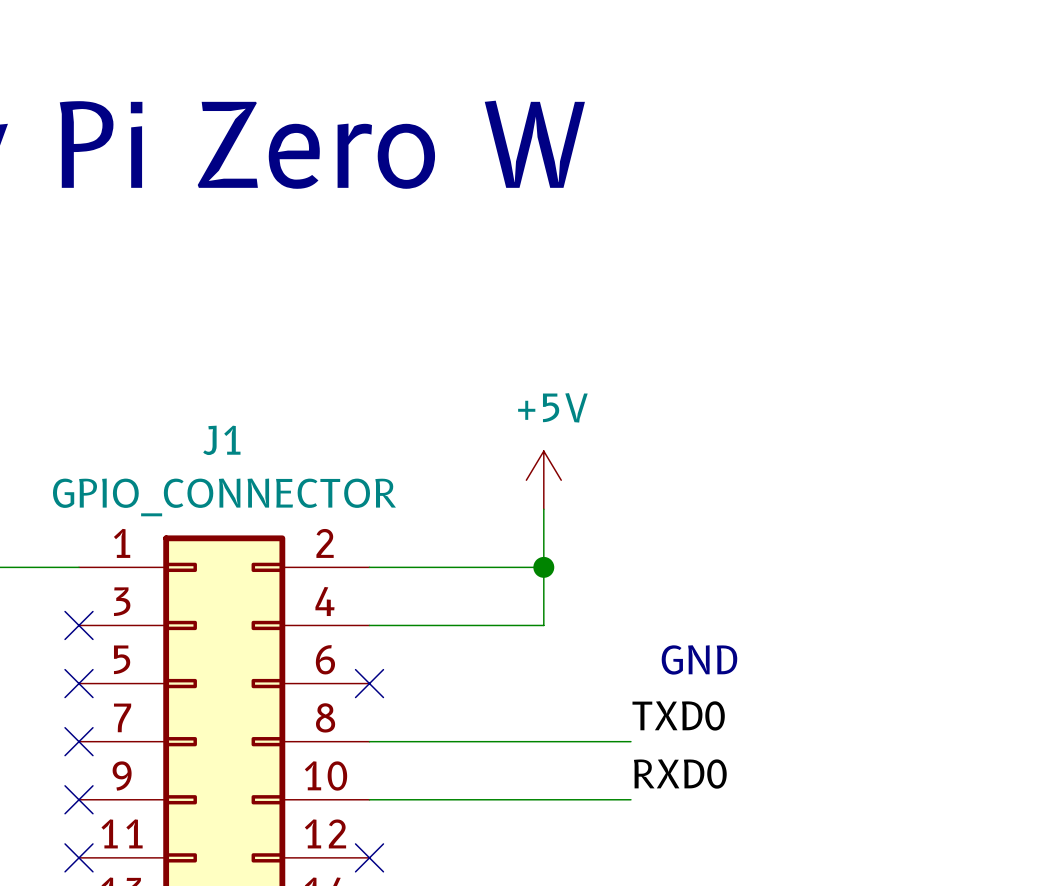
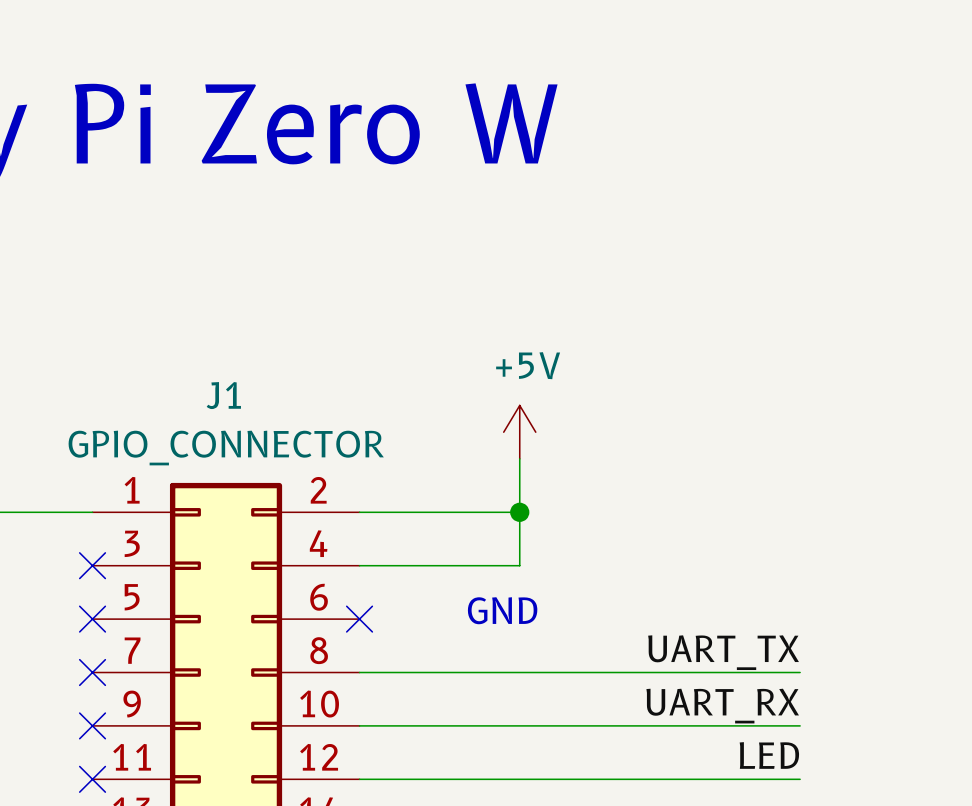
text position: GND (699, 659) -> GND (502, 610)
label: TXD0 (678, 715) -> none
label: none -> UART_TX (723, 652)
wire: none -> (599, 672) (800, 672)
label: RXD0 (680, 774) -> none
label: none -> UART_RX (722, 706)
wire: none -> (599, 725) (800, 725)
label: none -> LED (769, 755)
wire: none -> (359, 779) (800, 779)
no-connect mark: (369, 857) -> none

